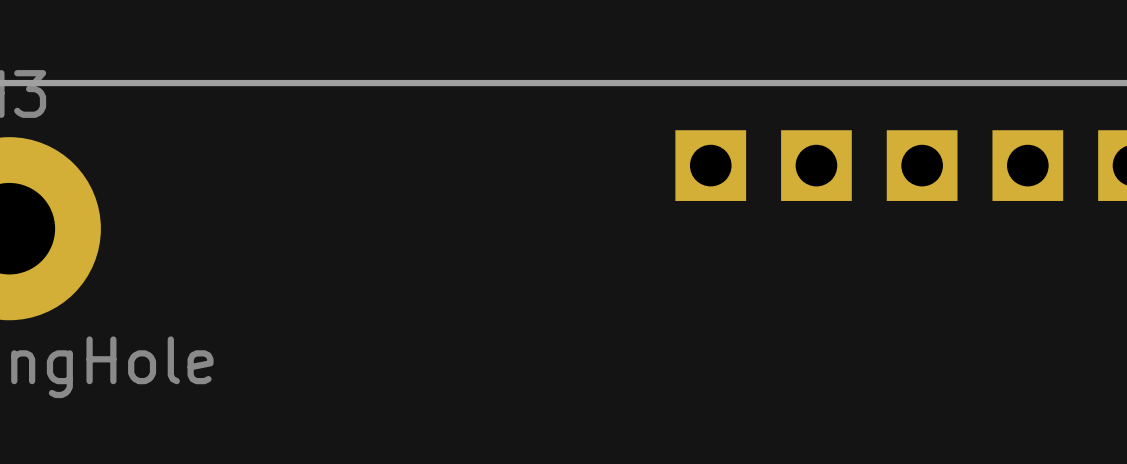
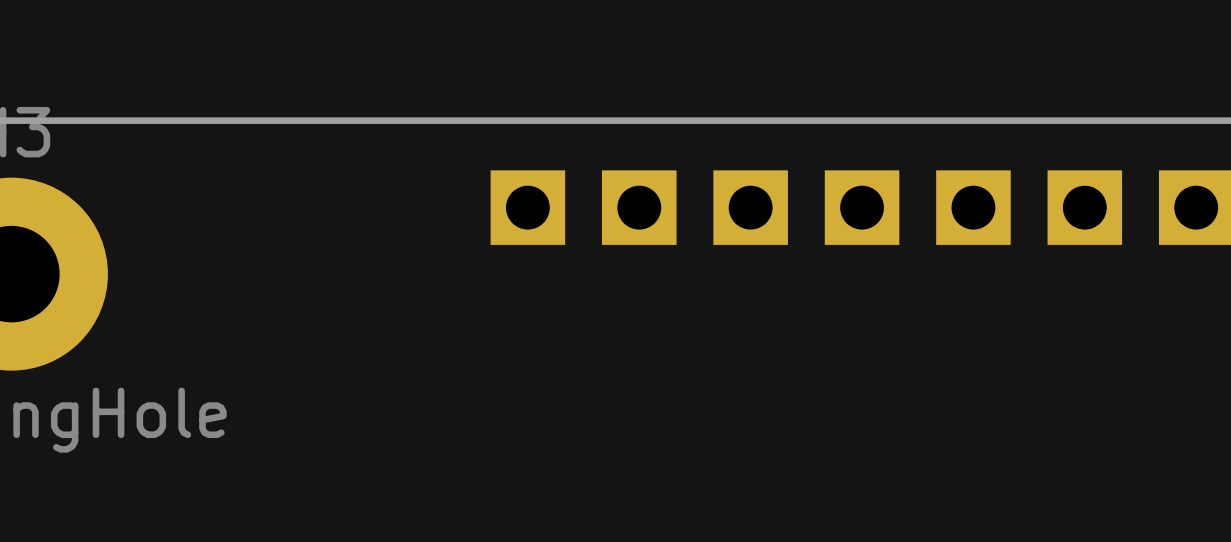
part: none -> (527, 207)
part: none -> (639, 207)

